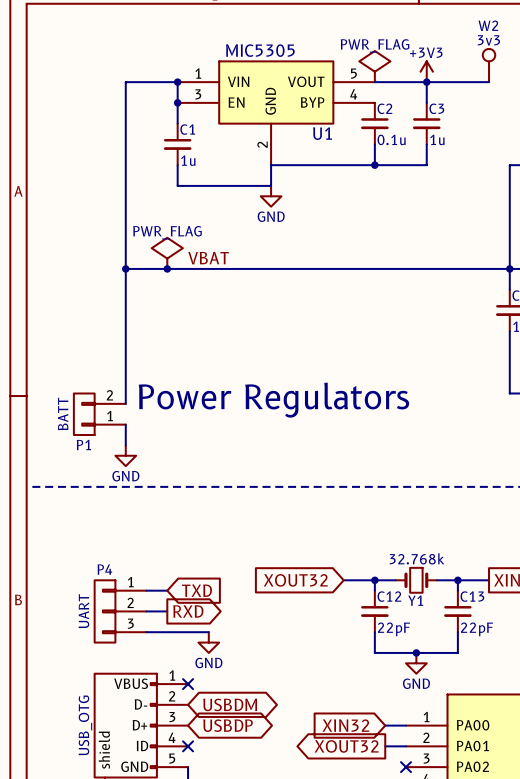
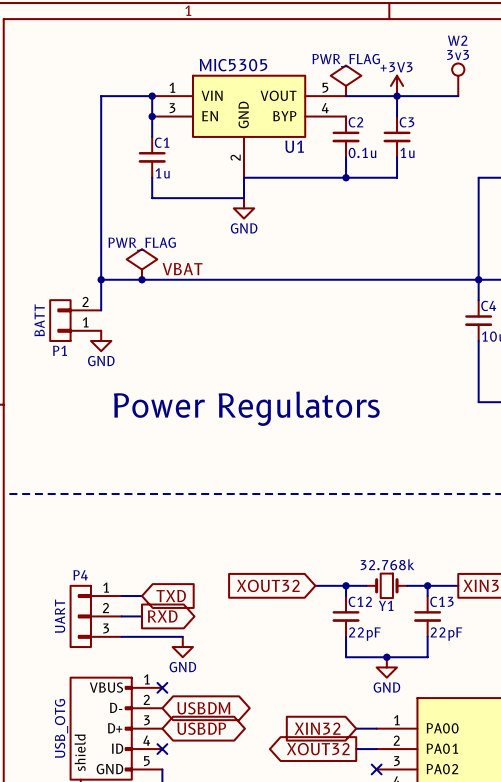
wire: (125, 300) (125, 403) -> none
P1 position: (99, 414) -> (75, 320)
wire: (125, 424) (125, 445) -> none
power symbol position: GND (125, 455) -> GND (101, 340)

